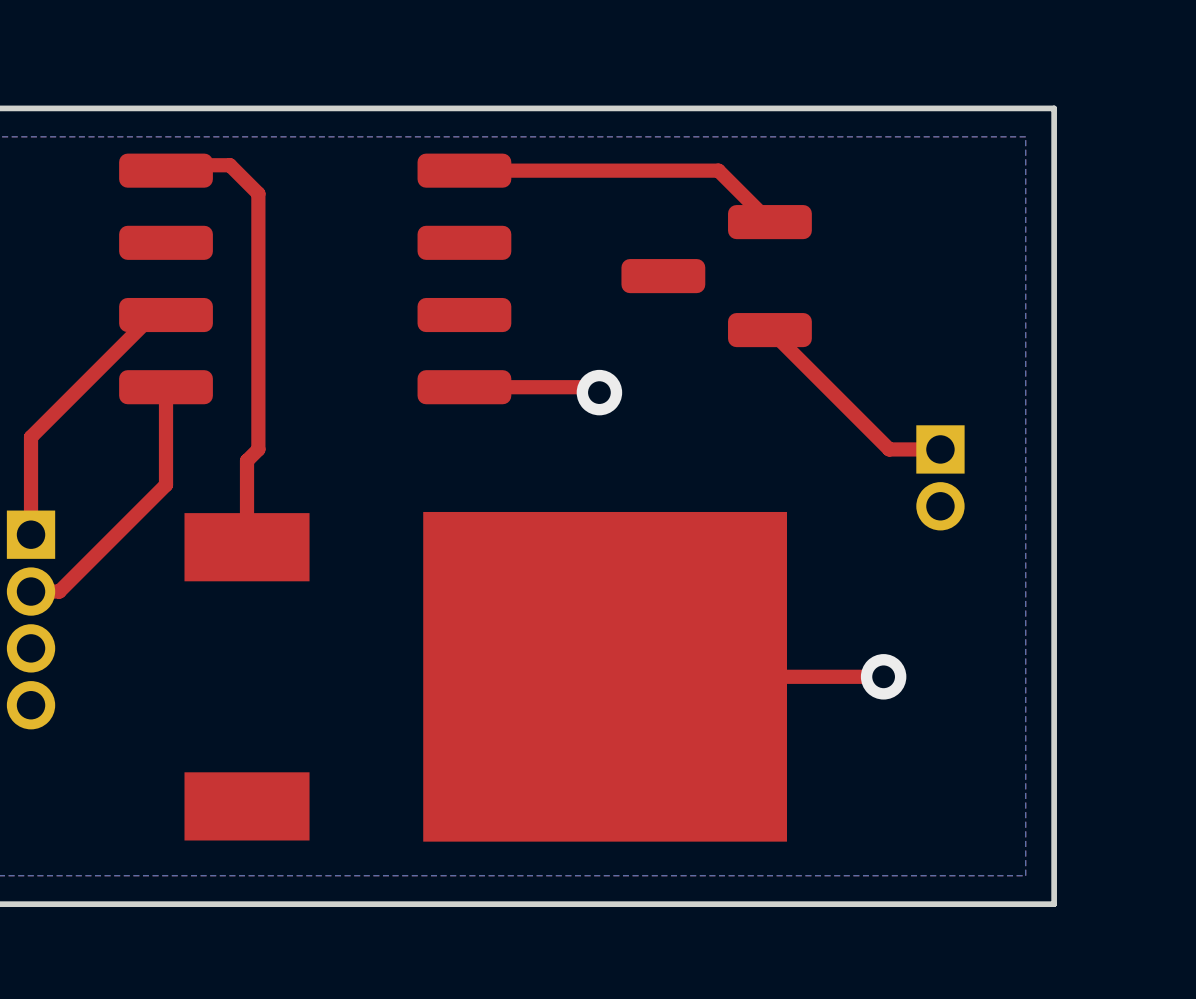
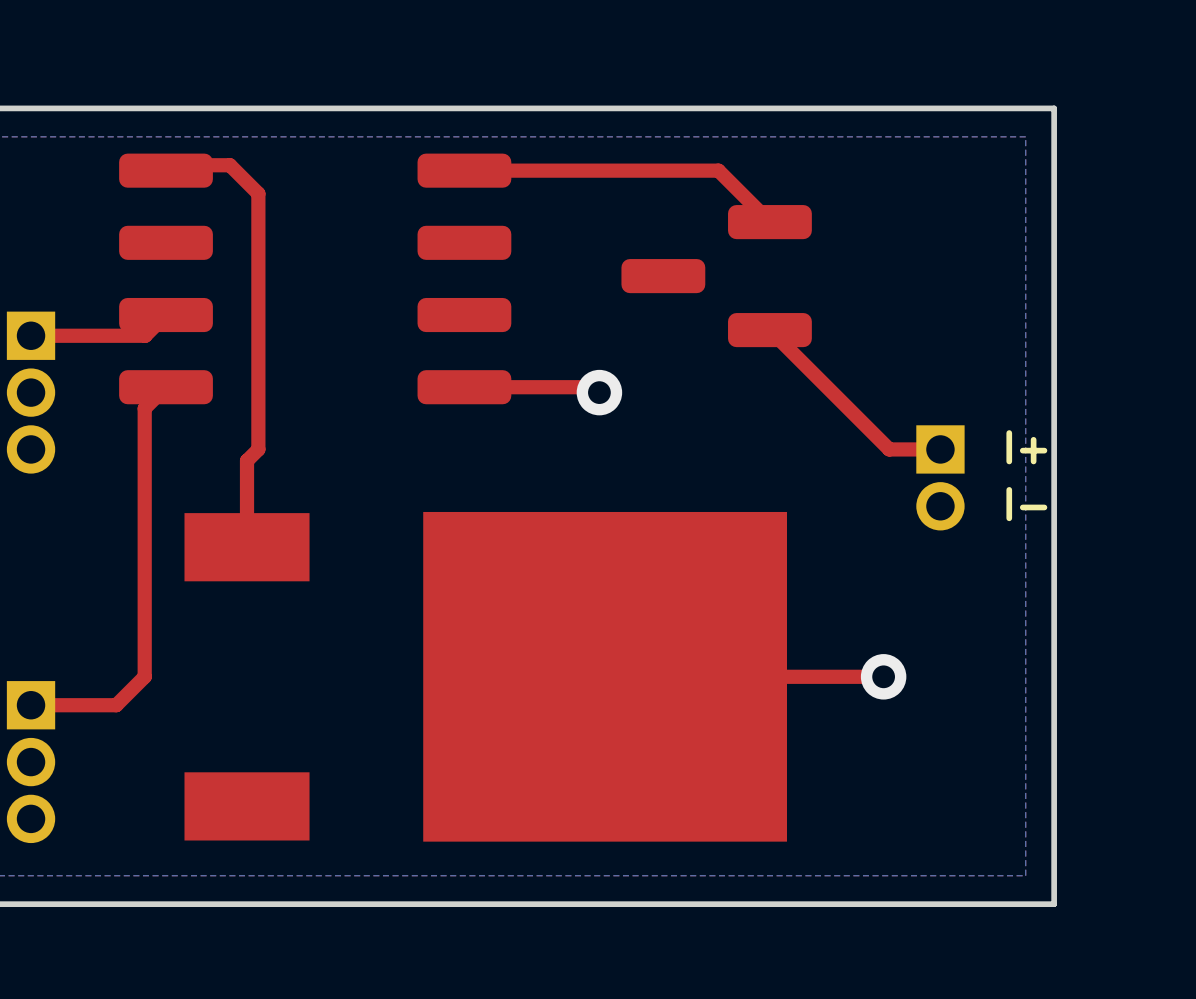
top track: (153, 315) (31, 437) (31, 534) -> none
top track: none -> (166, 315) (145, 335) (31, 335)
top track: (166, 387) (166, 484) (59, 591) (31, 591) -> (166, 387) (144, 408) (144, 676) (116, 705) (31, 705)
part: none -> (31, 392)
text: none -> I+ (1026, 447)
text: none -> I- (1026, 504)
part: (31, 619) -> none
part: none -> (31, 762)

